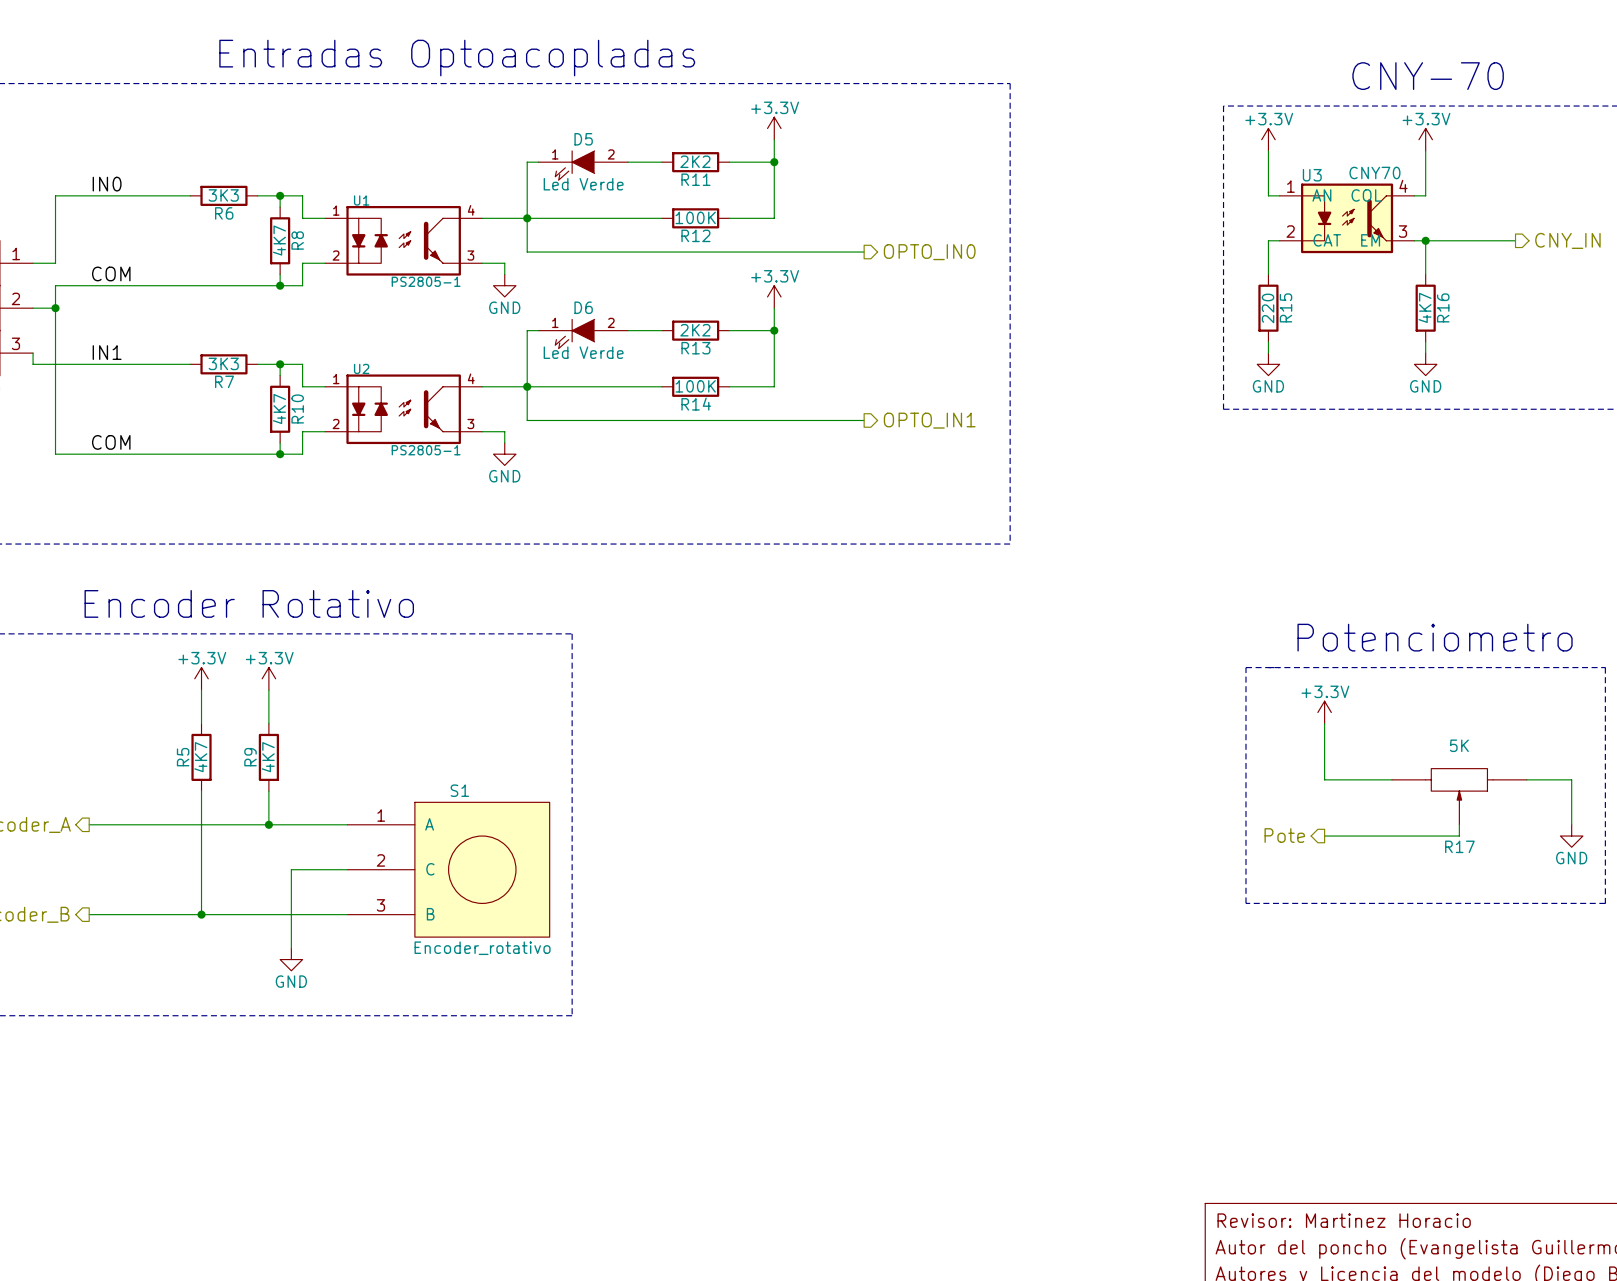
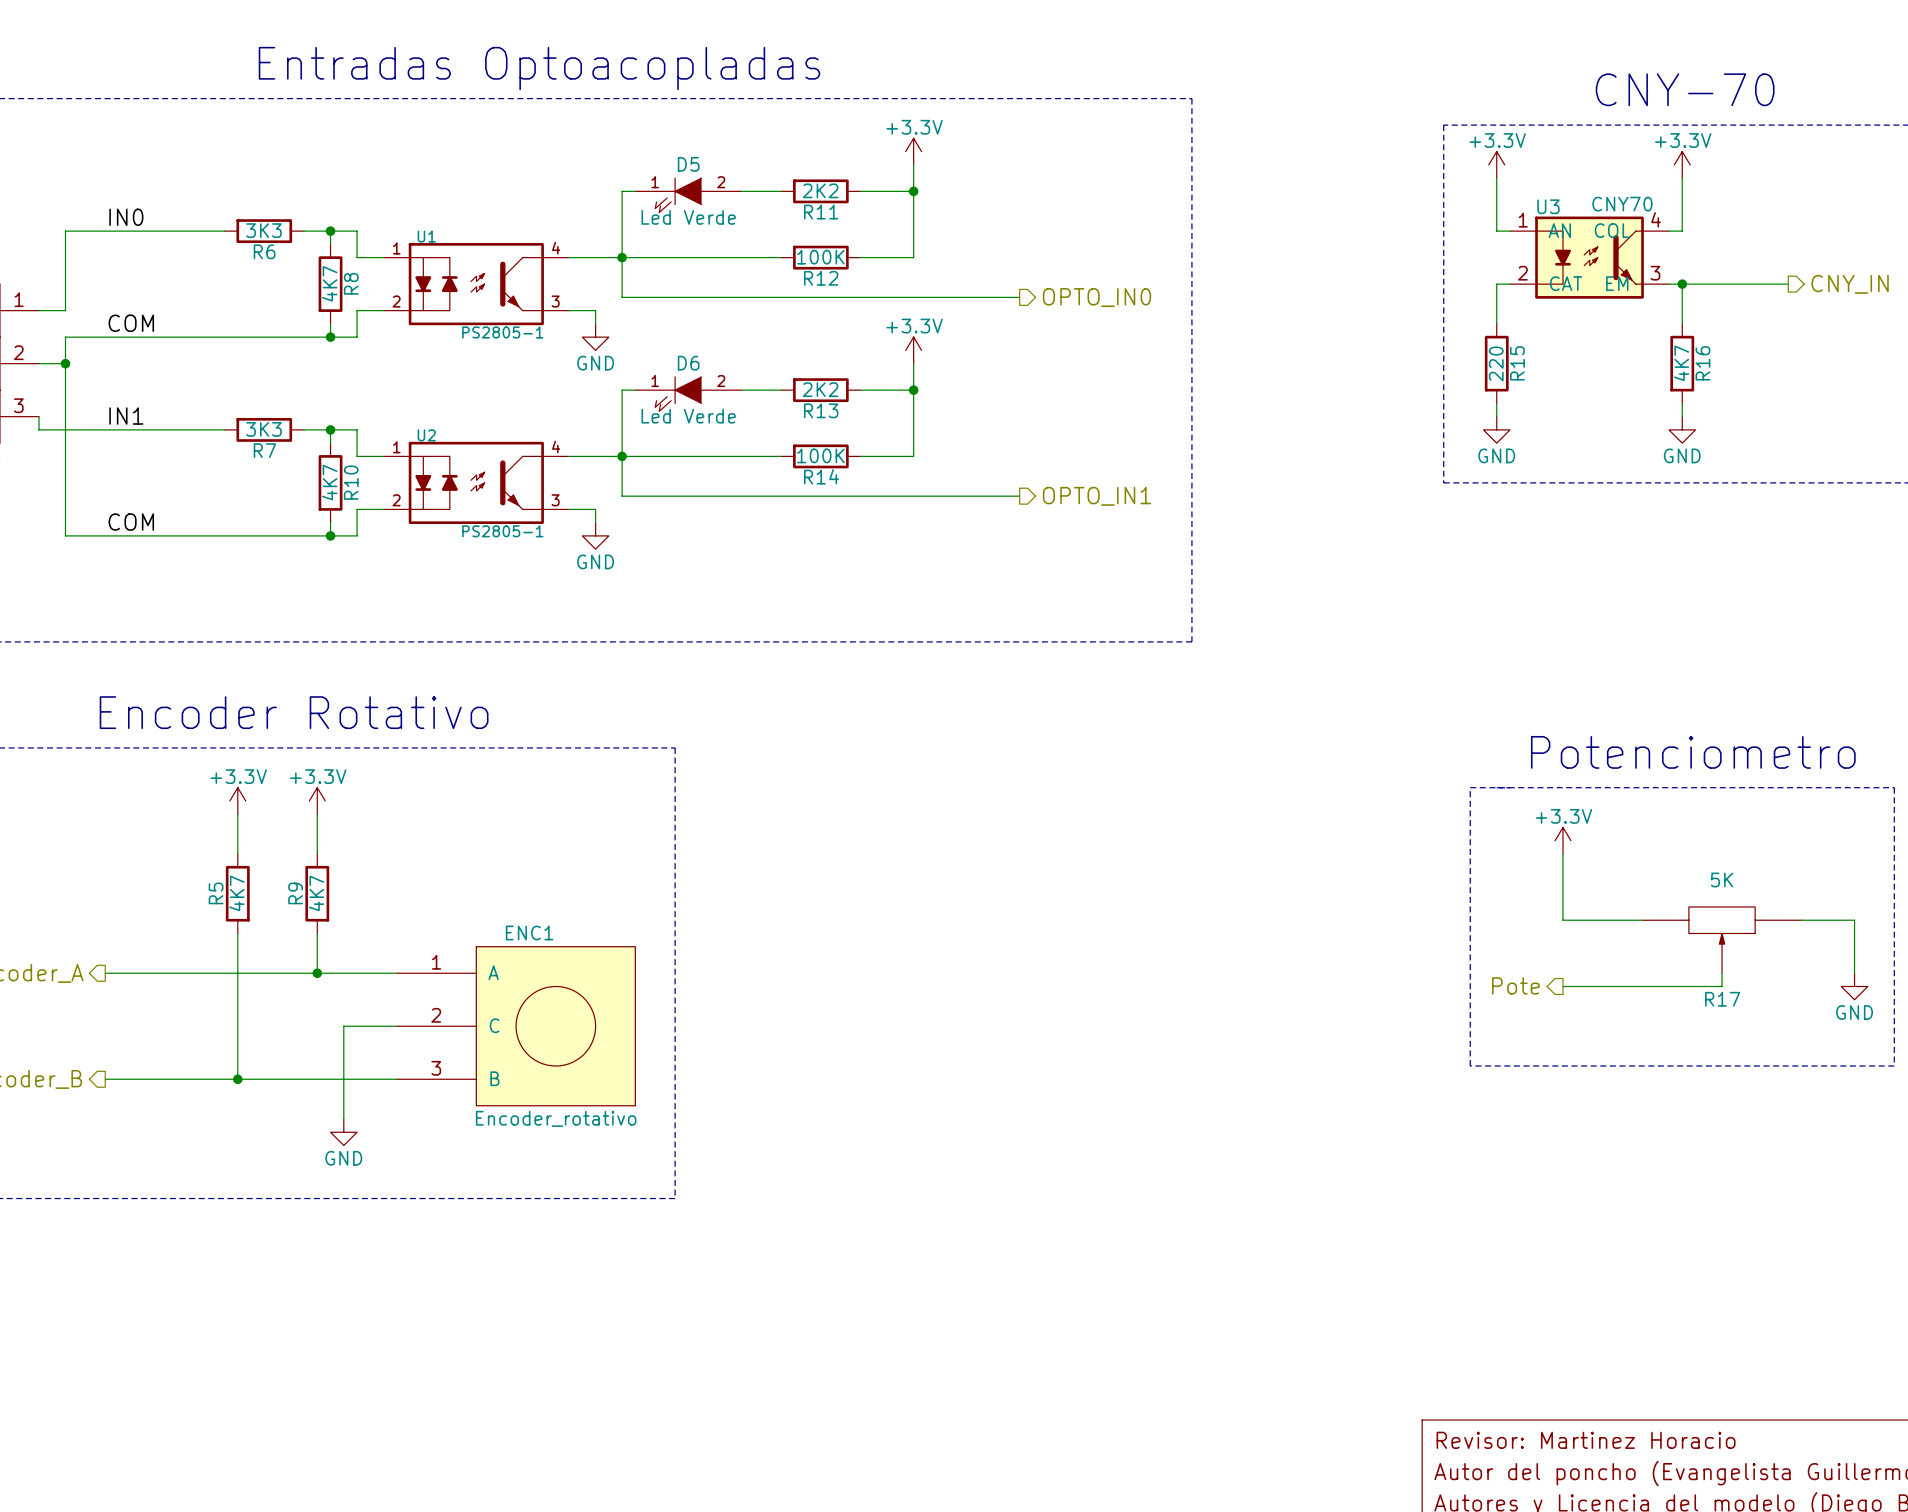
ENC1: none -> Encoder_rotativo (516, 1026)
S1: Encoder_rotativo (448, 869) -> none

